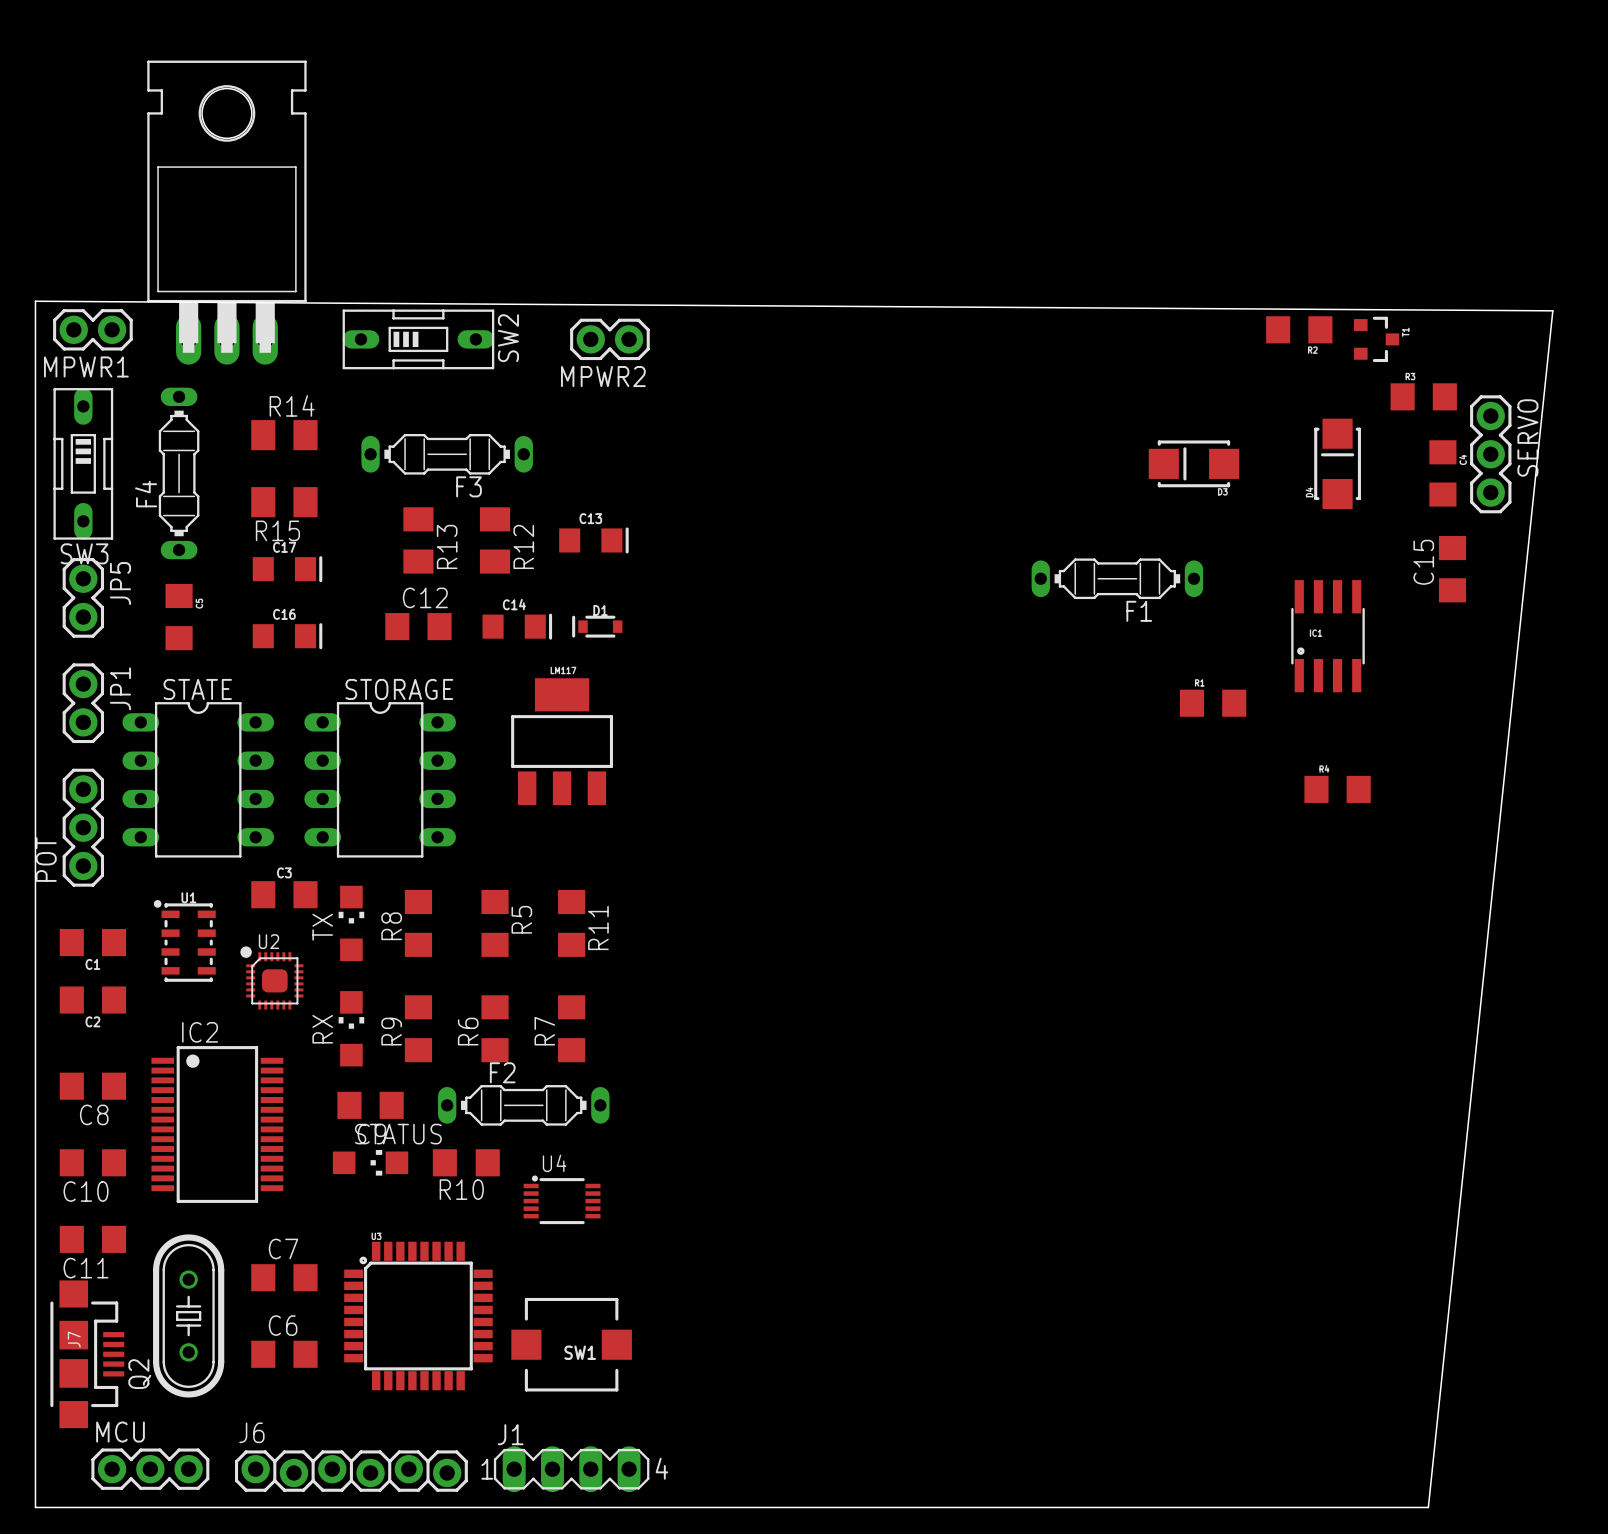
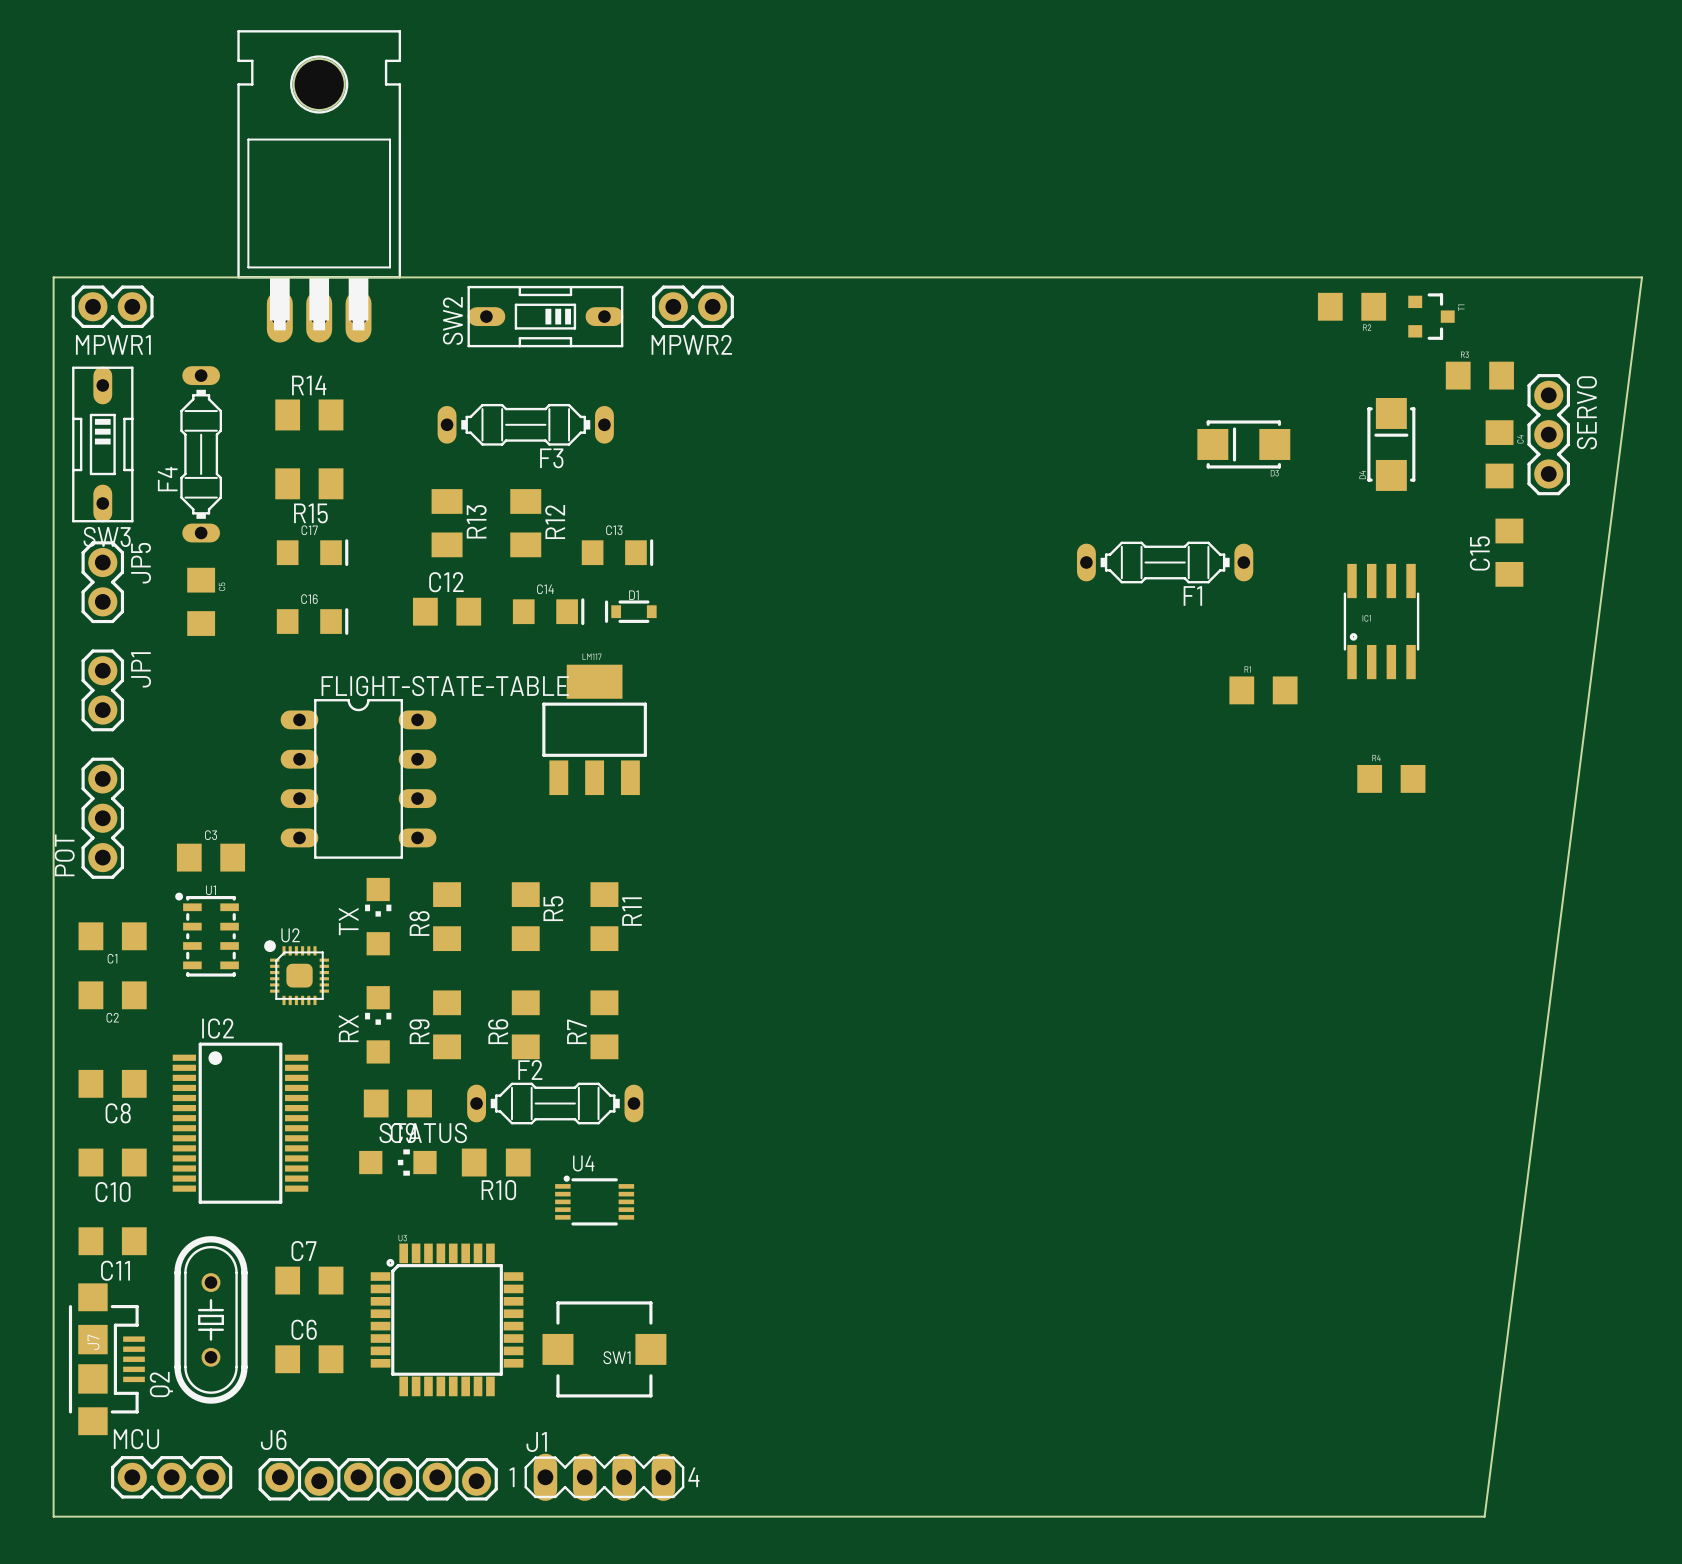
part position: (226, 212) -> (319, 186)
board edge: (35, 301) (1552, 310) (1428, 1507) -> (53, 277) (1641, 277) (1484, 1516)
SW2 rotation: 0° (418, 339) -> 180° (545, 316)
SW2 position: (418, 339) -> (545, 316)
MPWR2 position: (609, 339) -> (692, 306)
F3 position: (447, 454) -> (525, 424)
C13 position: (593, 540) -> (617, 552)
STATE: (198, 779) -> none
STORAGE: (380, 779) -> none
FLIGHT-STATE-TABLE: none -> (358, 778)
C3 position: (284, 894) -> (210, 857)

